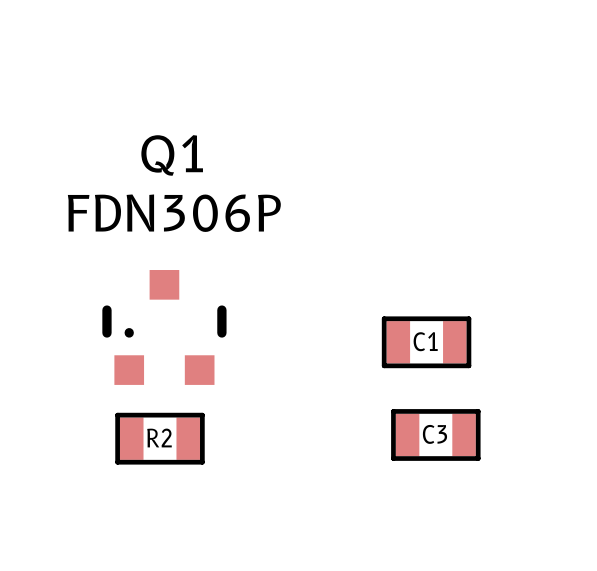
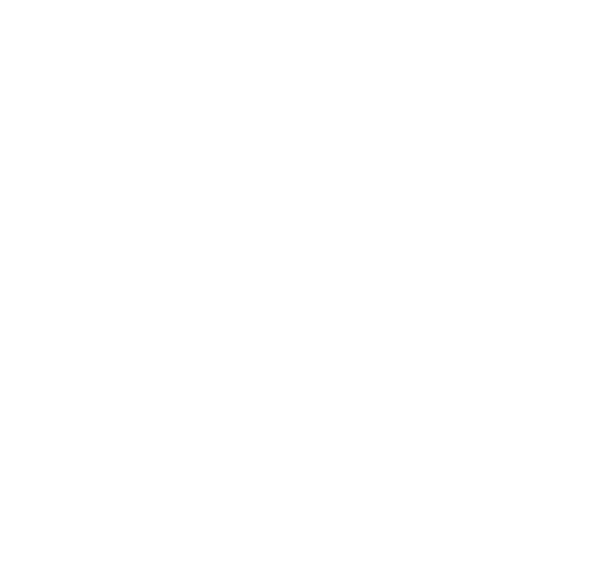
Q1: FDN306P (164, 327) -> none
C1: (426, 342) -> none
C3: (435, 434) -> none
R2: (159, 438) -> none

